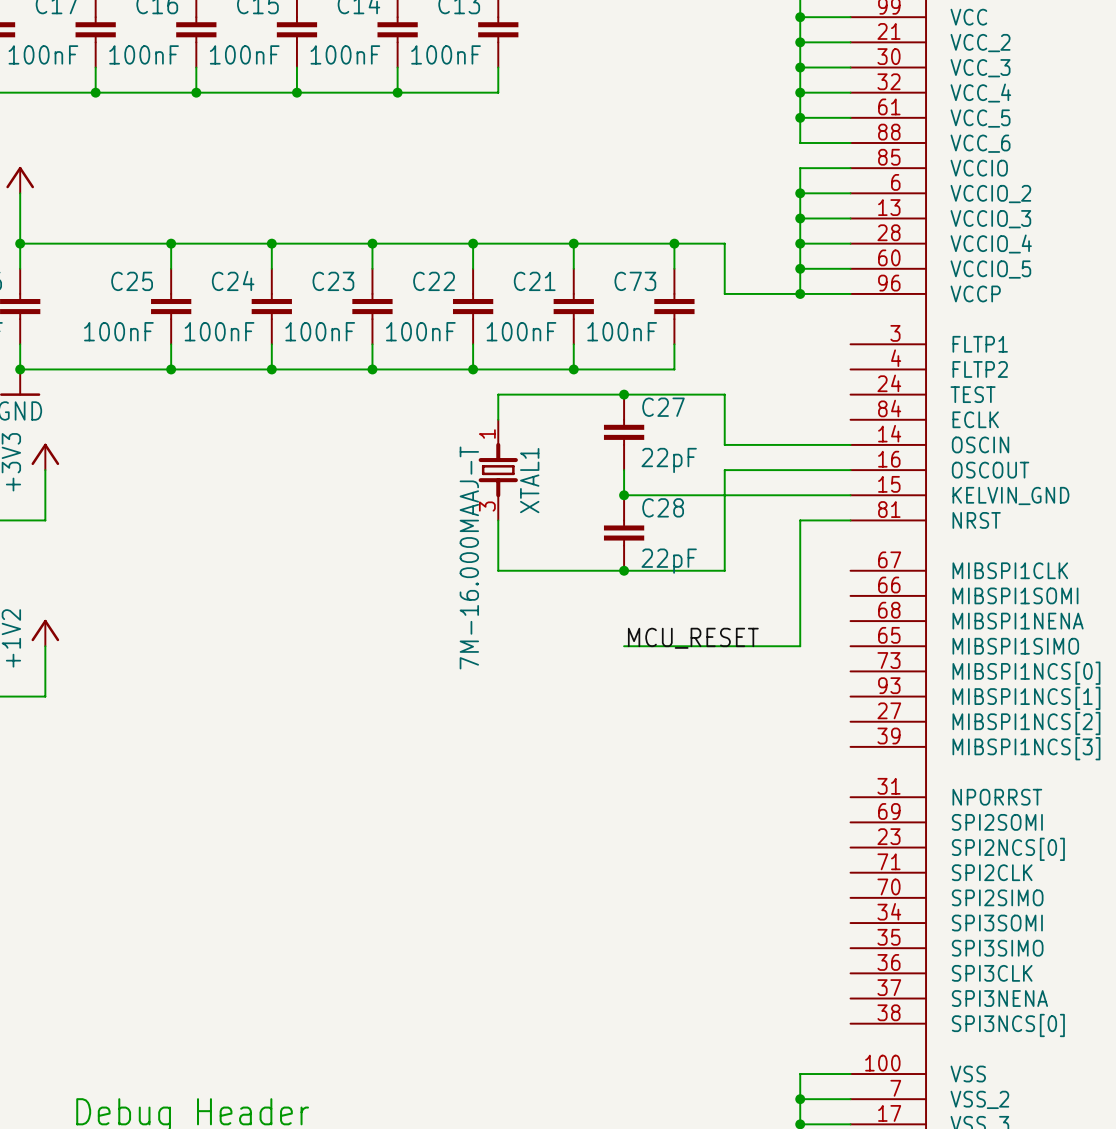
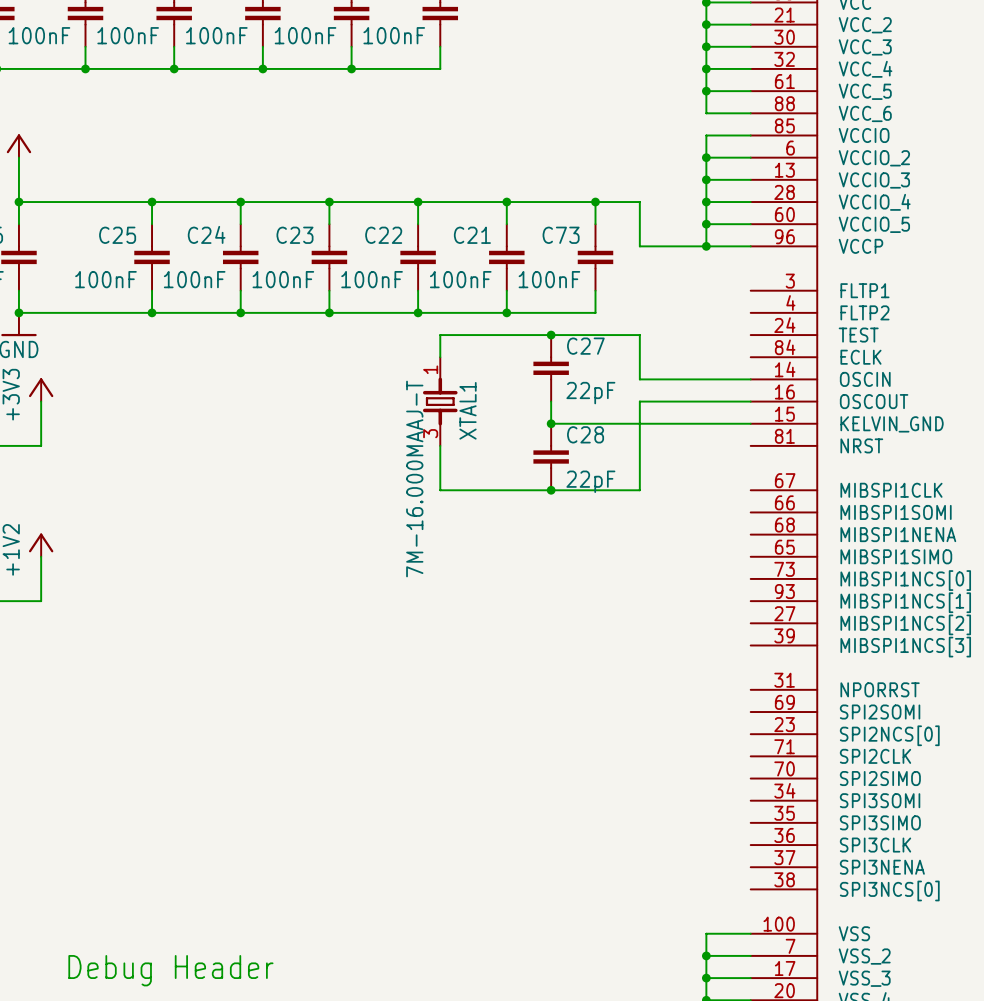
wire: (850, 520) (800, 520) (800, 646) (624, 646) -> none
label: MCU_RESET (693, 638) -> none

